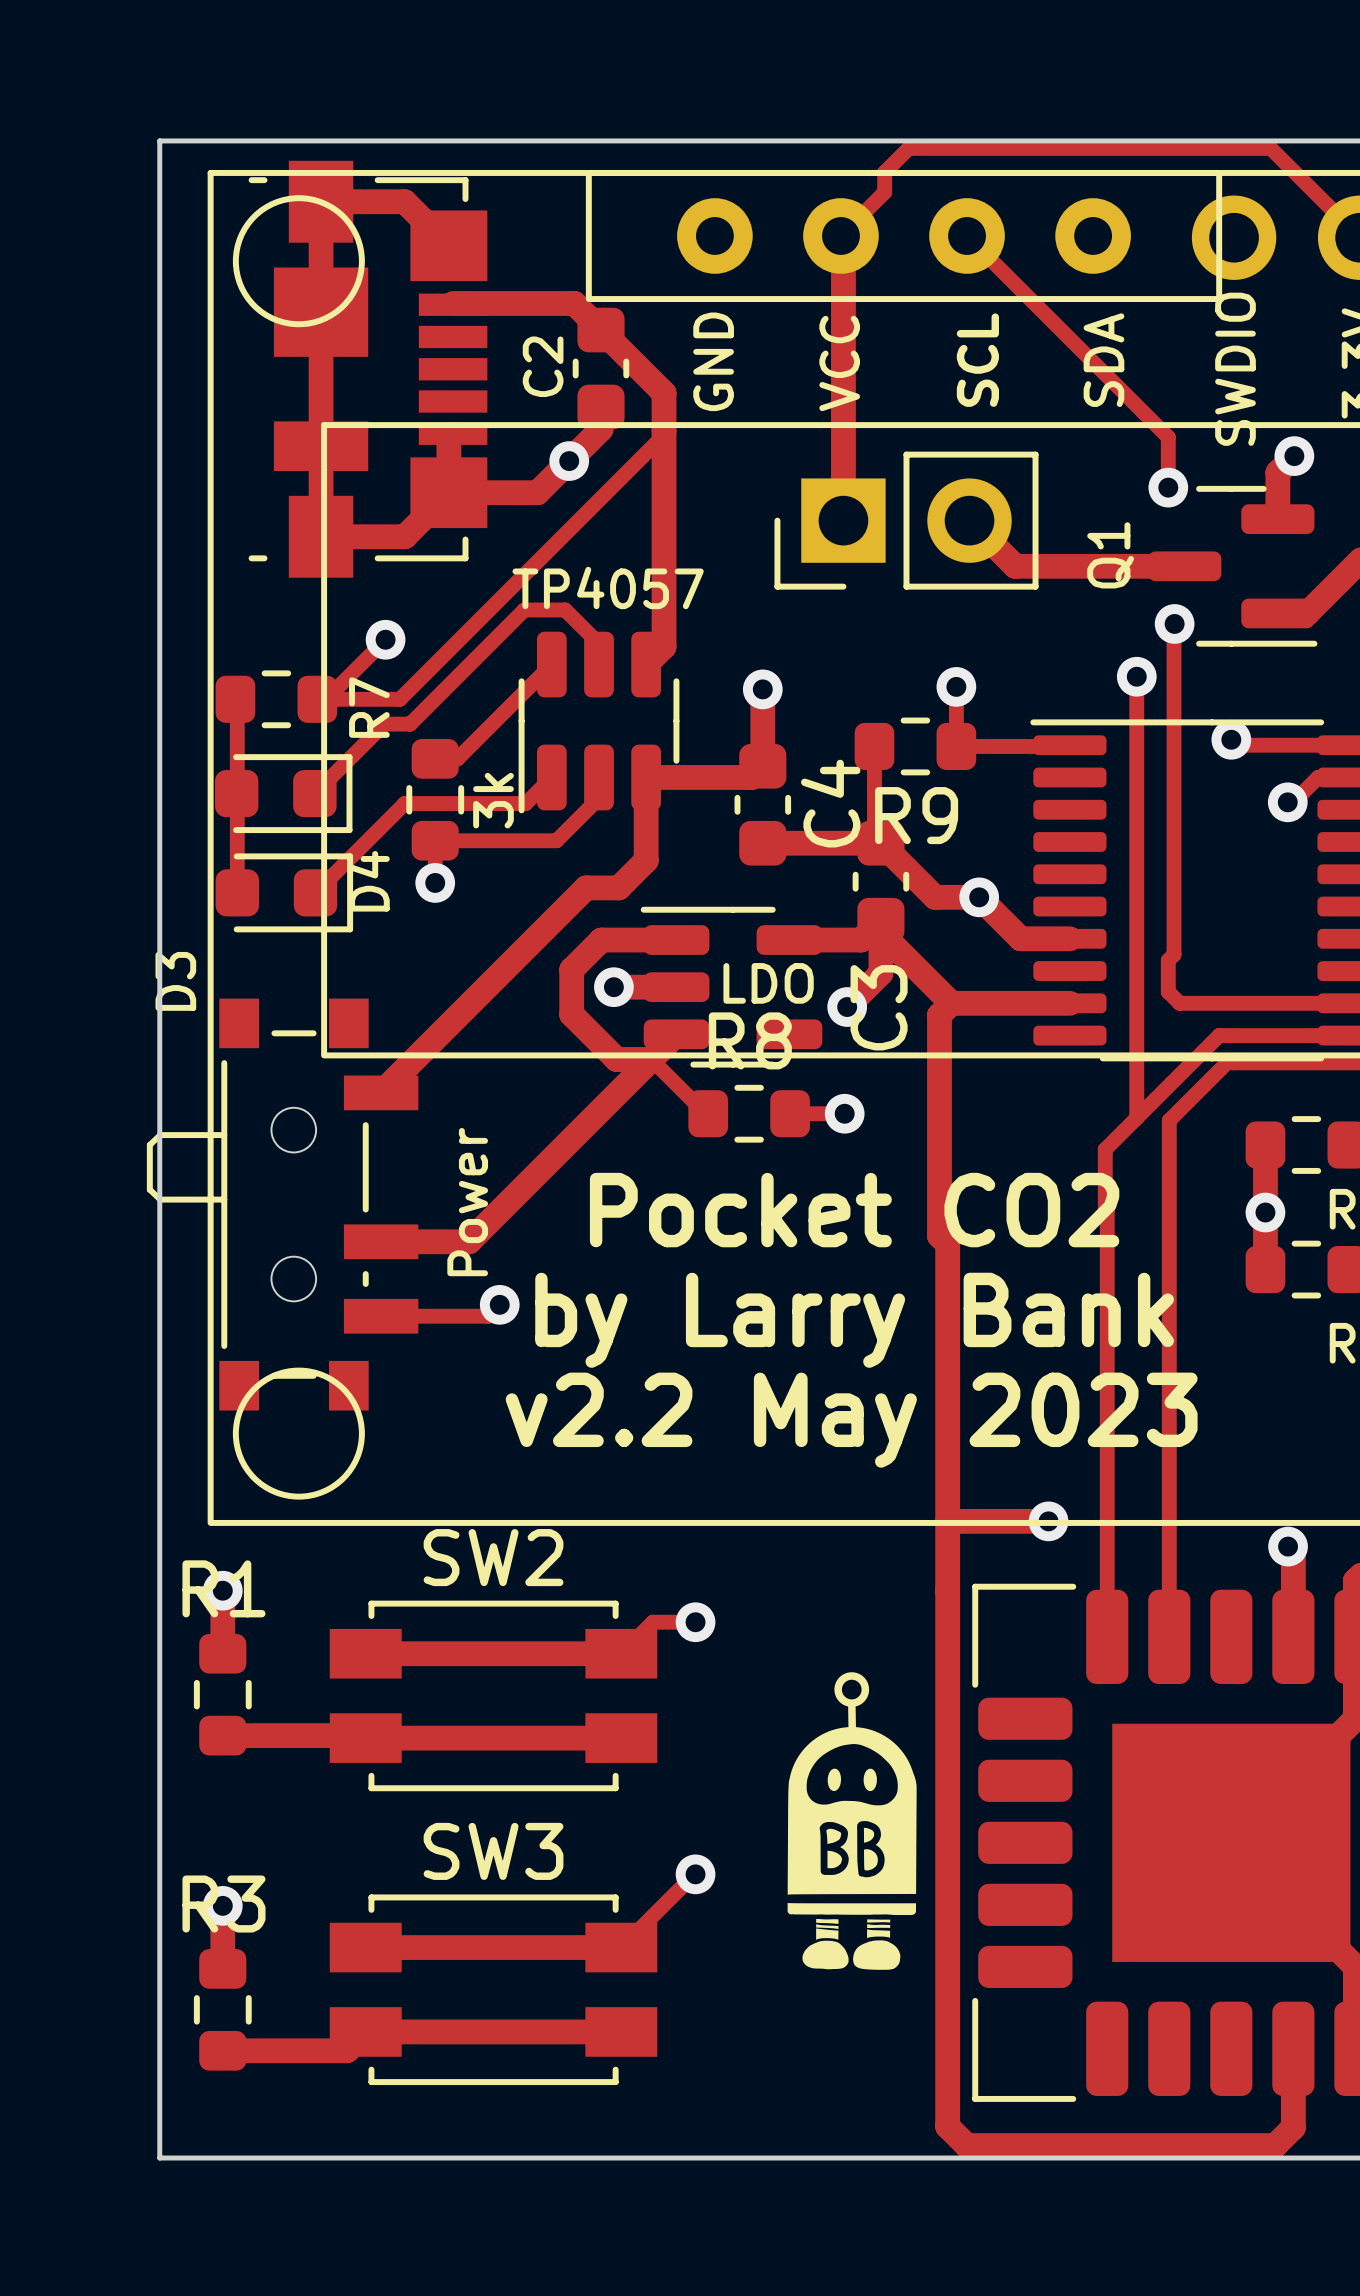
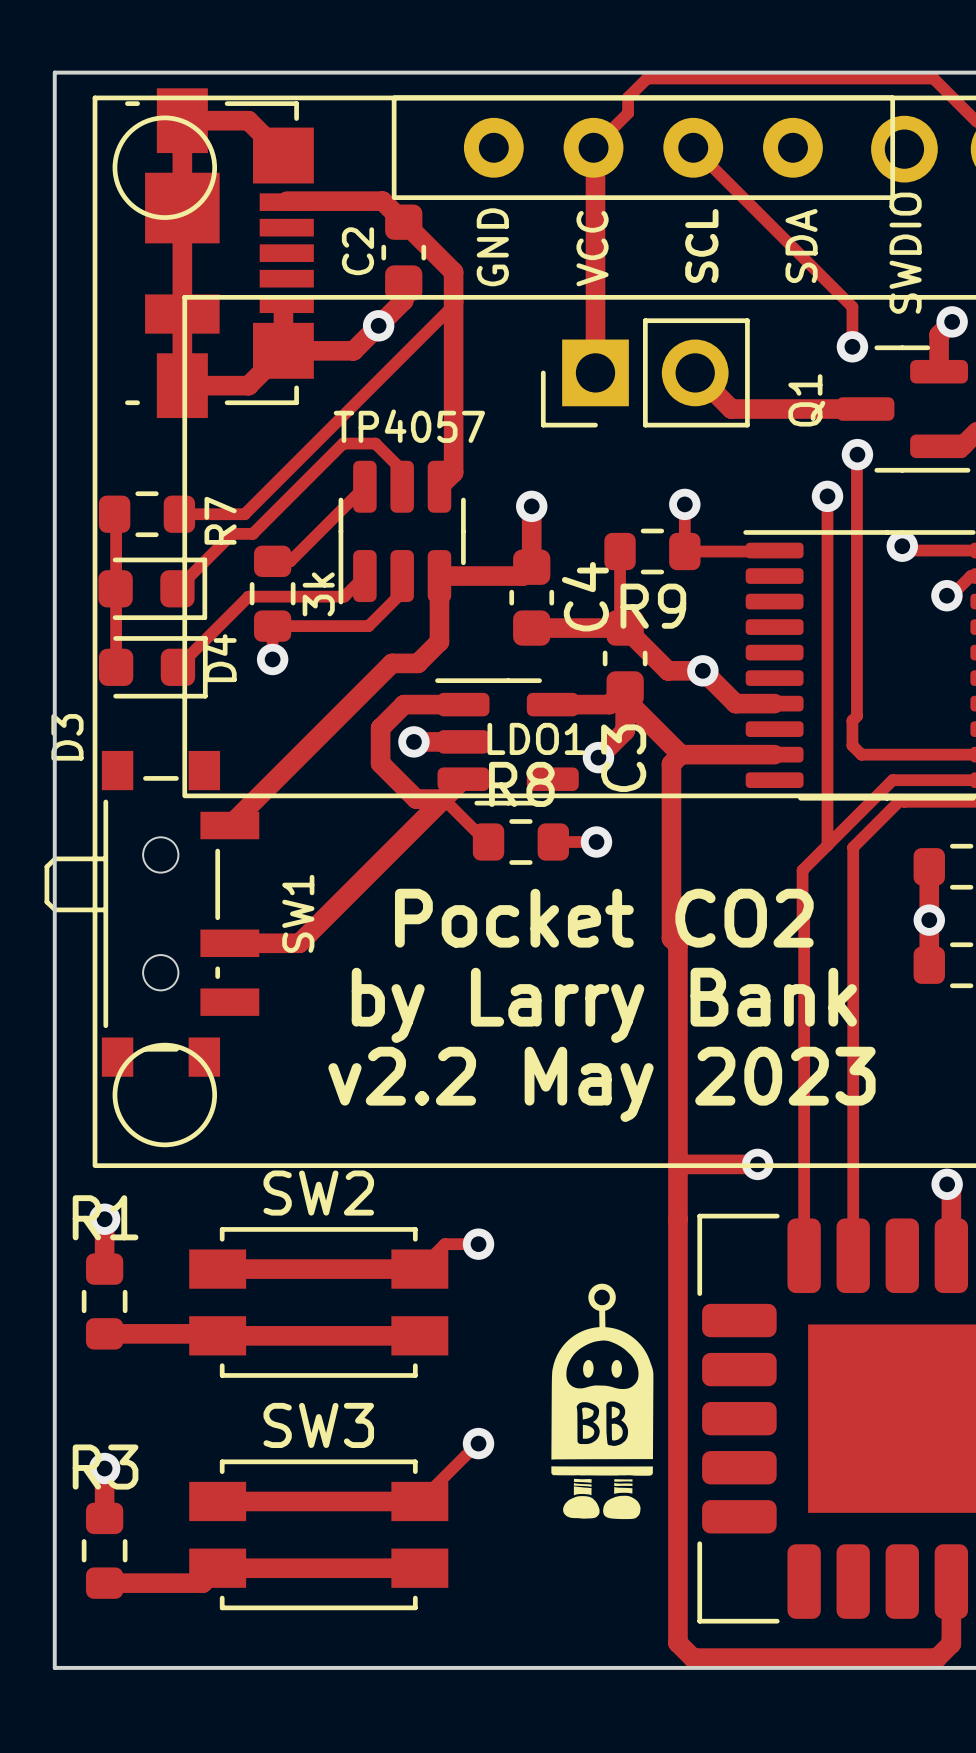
track: (385, 639) (326, 699) -> none
via: (385, 639) -> none
LDO name: LDO (768, 983) -> LDO1 (536, 738)
Power name: Power (467, 1202) -> SW1 (298, 913)
track: (499, 1304) (488, 1316) (381, 1316) -> none
via: (499, 1304) -> none

